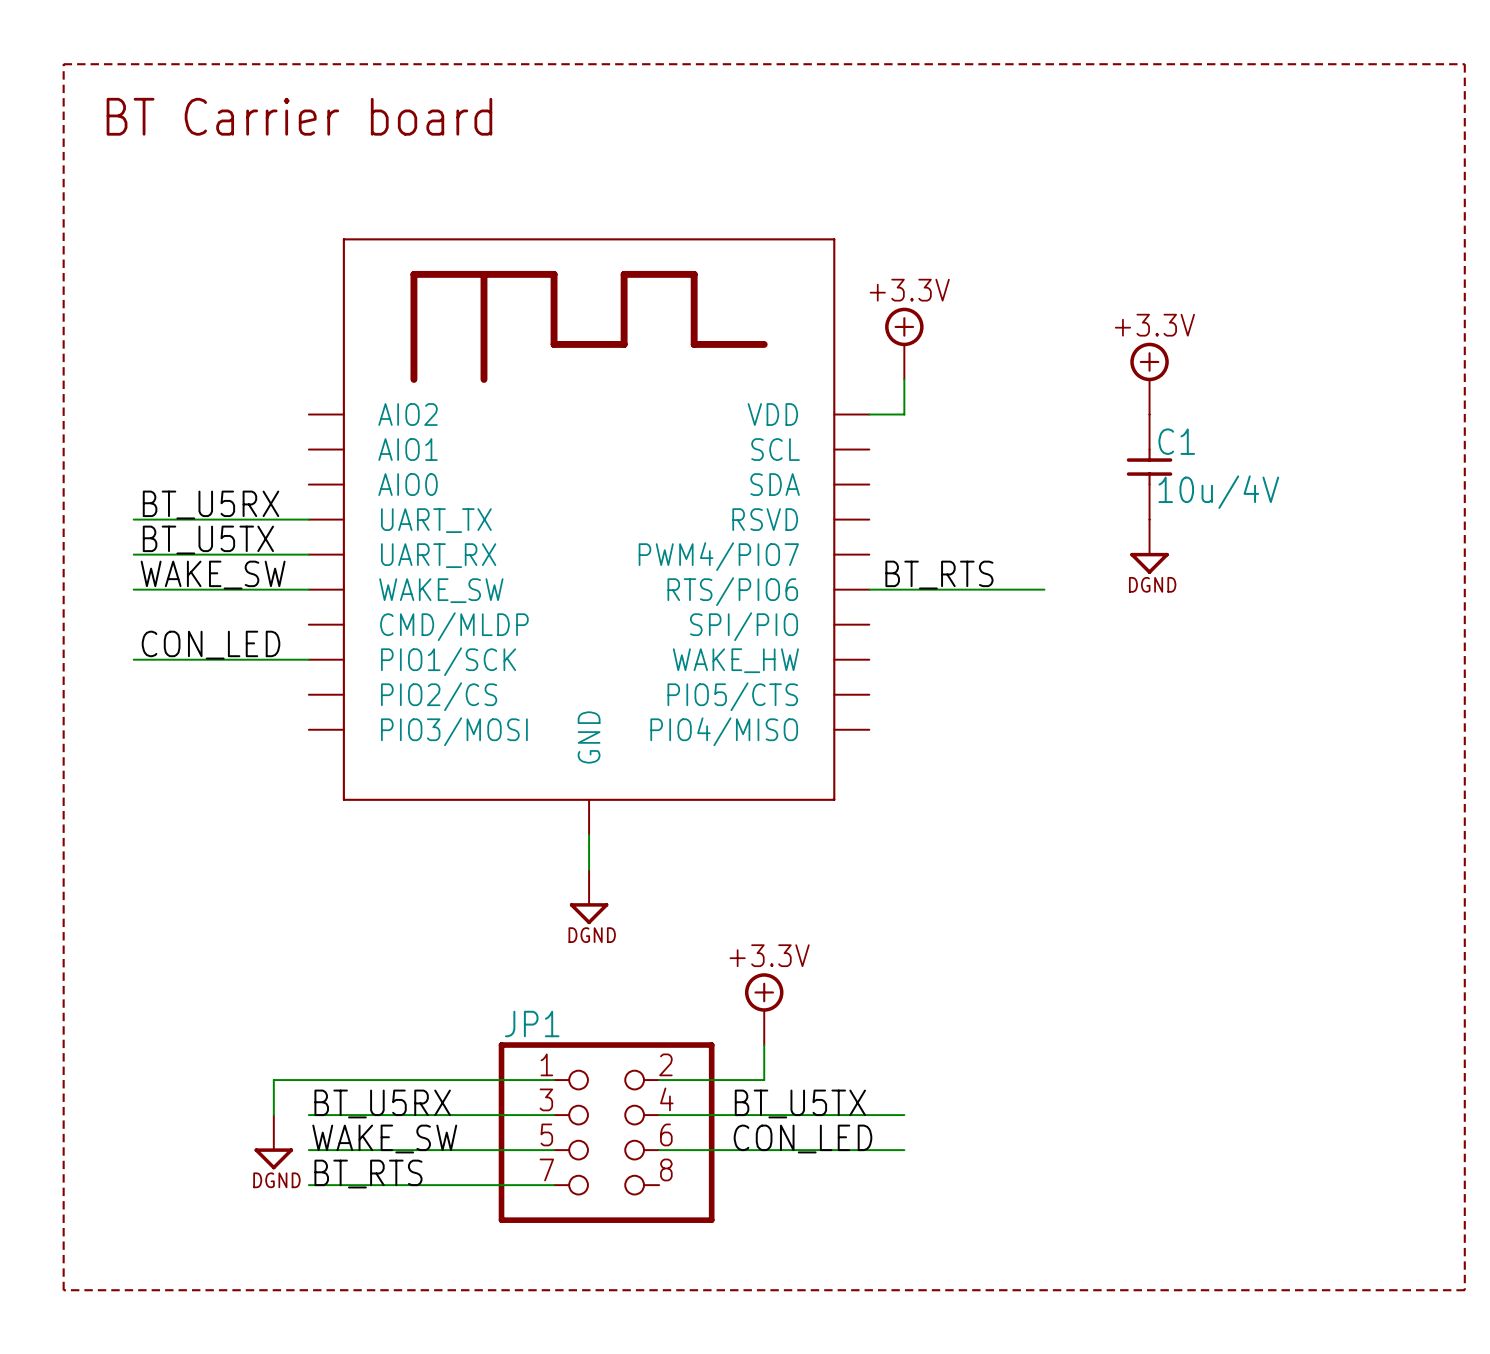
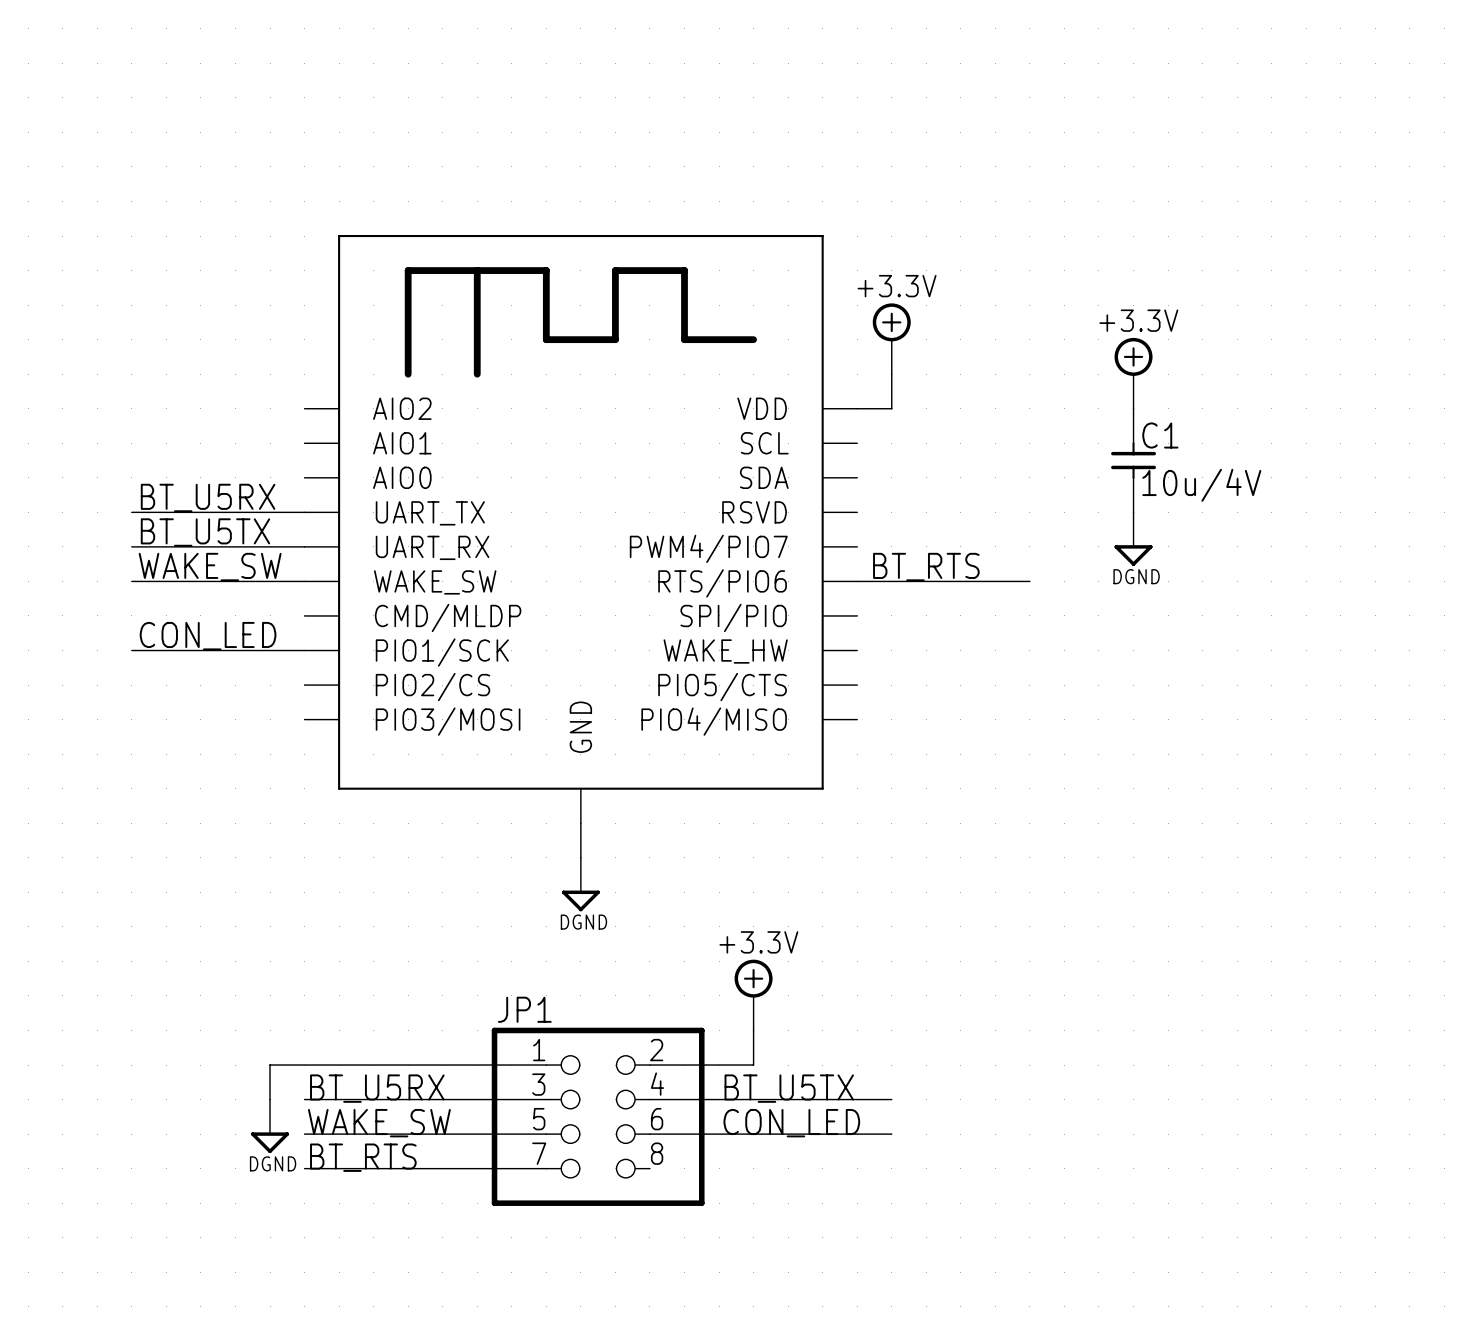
line: (63, 64) (1464, 64) (1464, 1290) (63, 1290) (63, 64) -> none
text: BT Carrier board (299, 116) -> none

